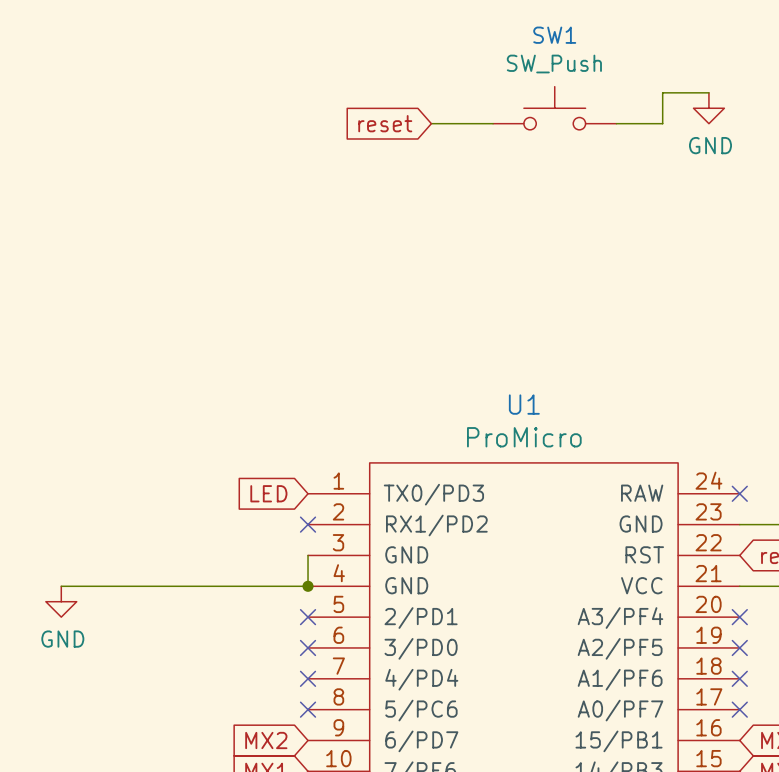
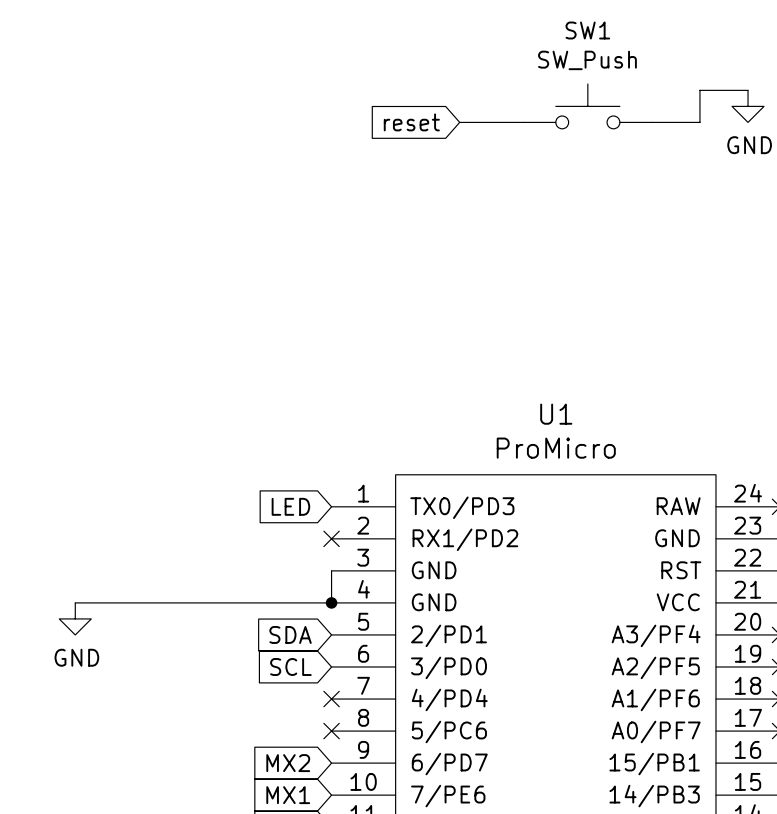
global label: none -> SDA (290, 634)
no-connect mark: (308, 617) -> none
global label: none -> SCL (290, 666)
no-connect mark: (308, 647) -> none

